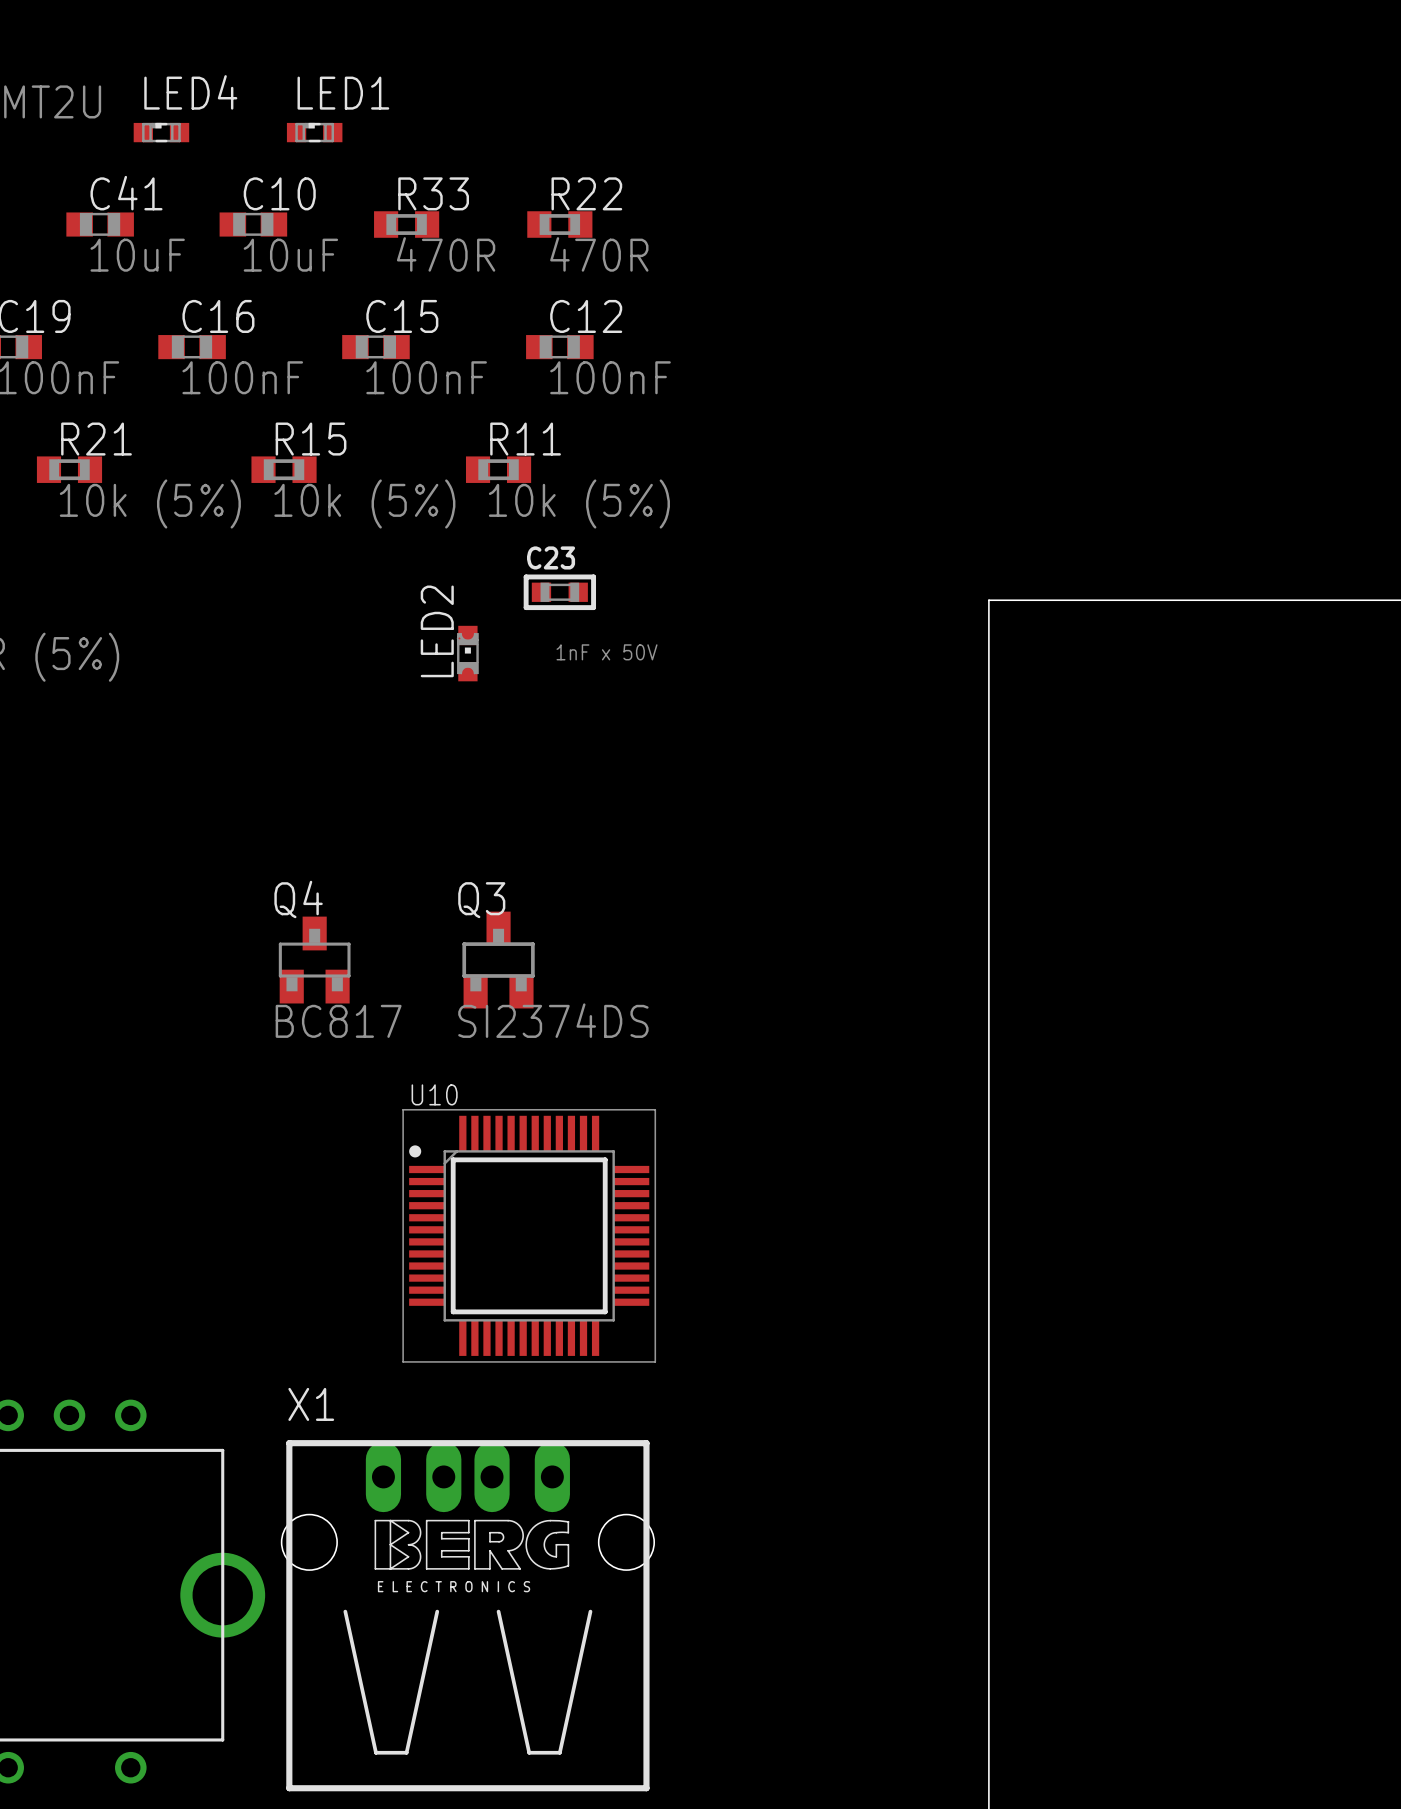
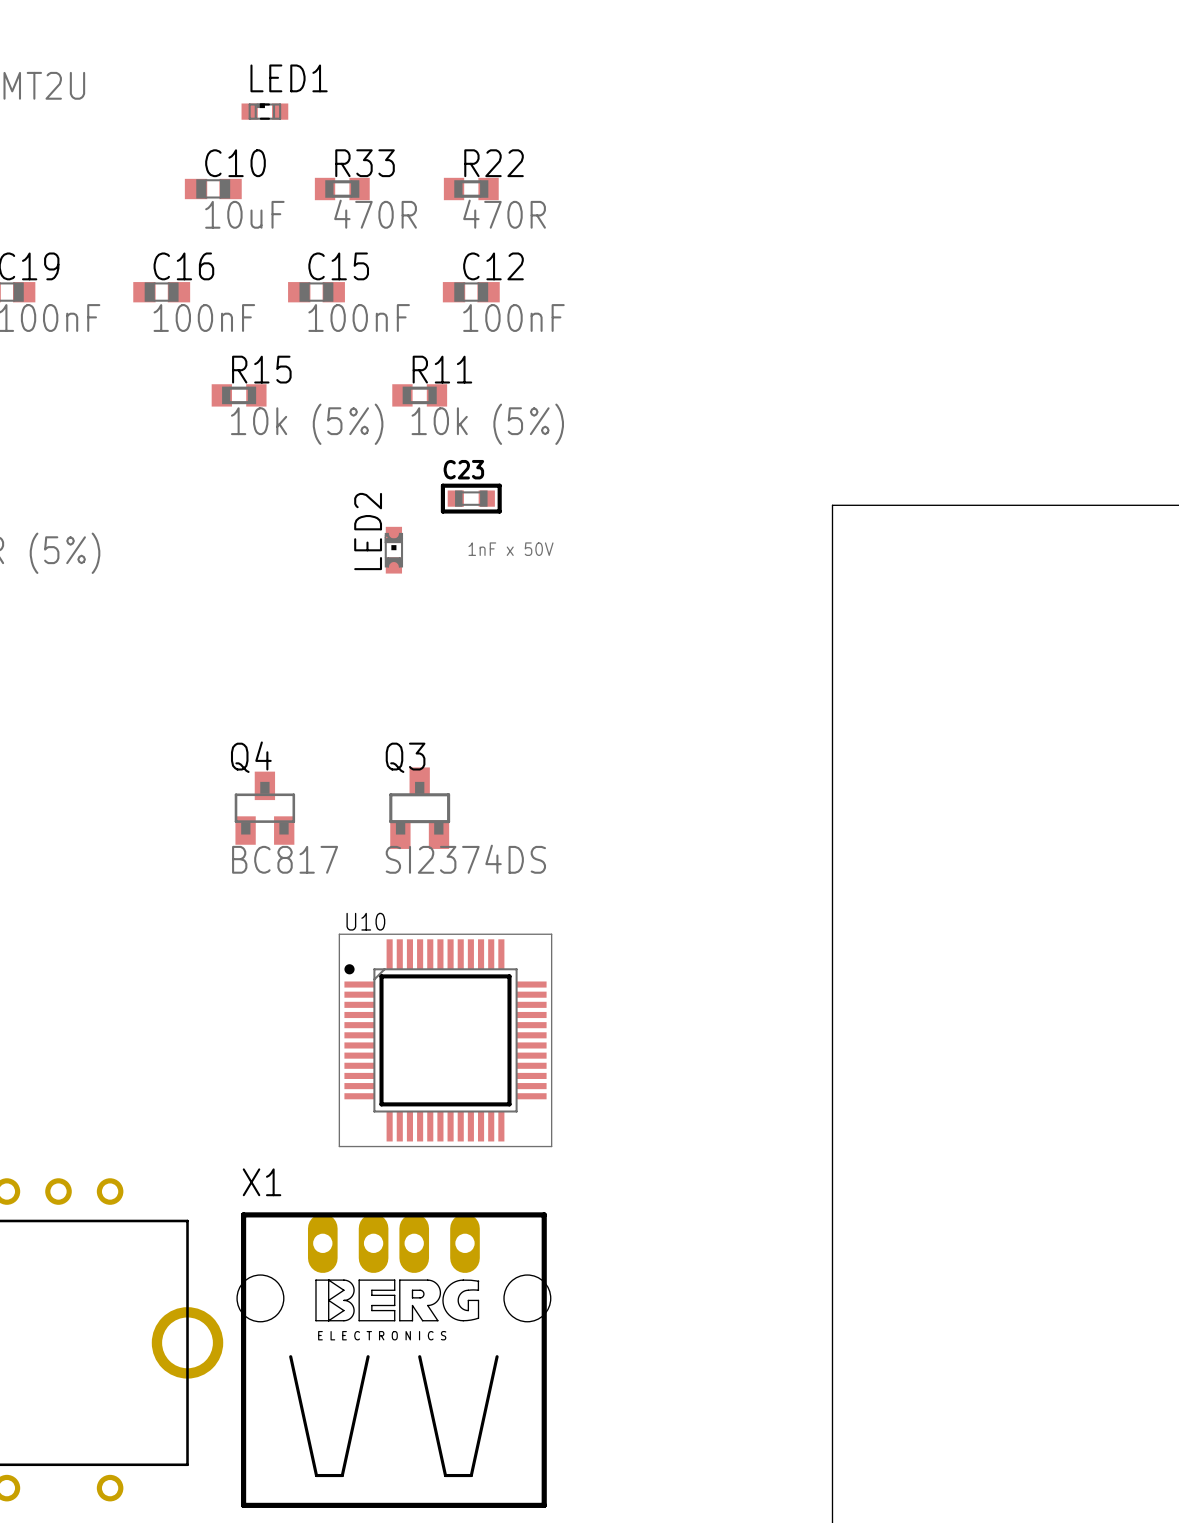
LED4: (161, 132) -> none
C41: 10uF (100, 224) -> none
R21: 10k (5%) (69, 469) -> none

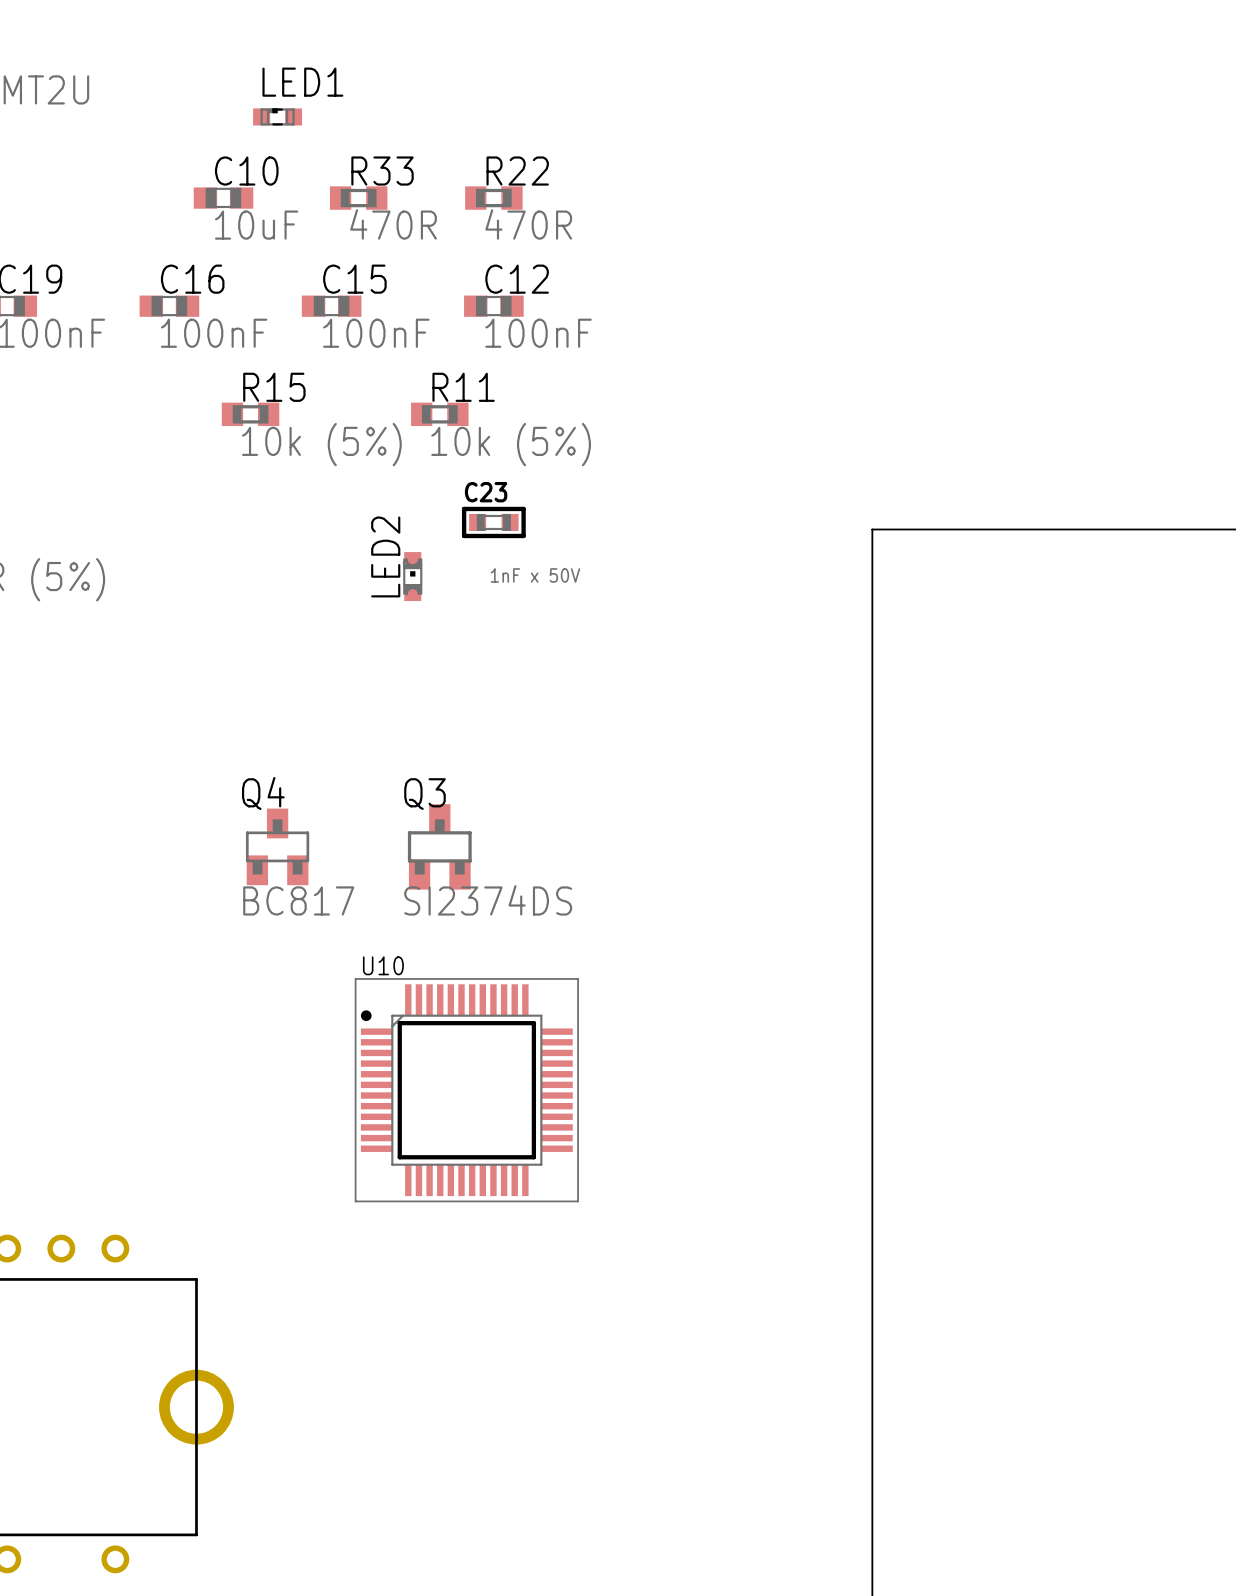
X1: (393, 1360) -> none

